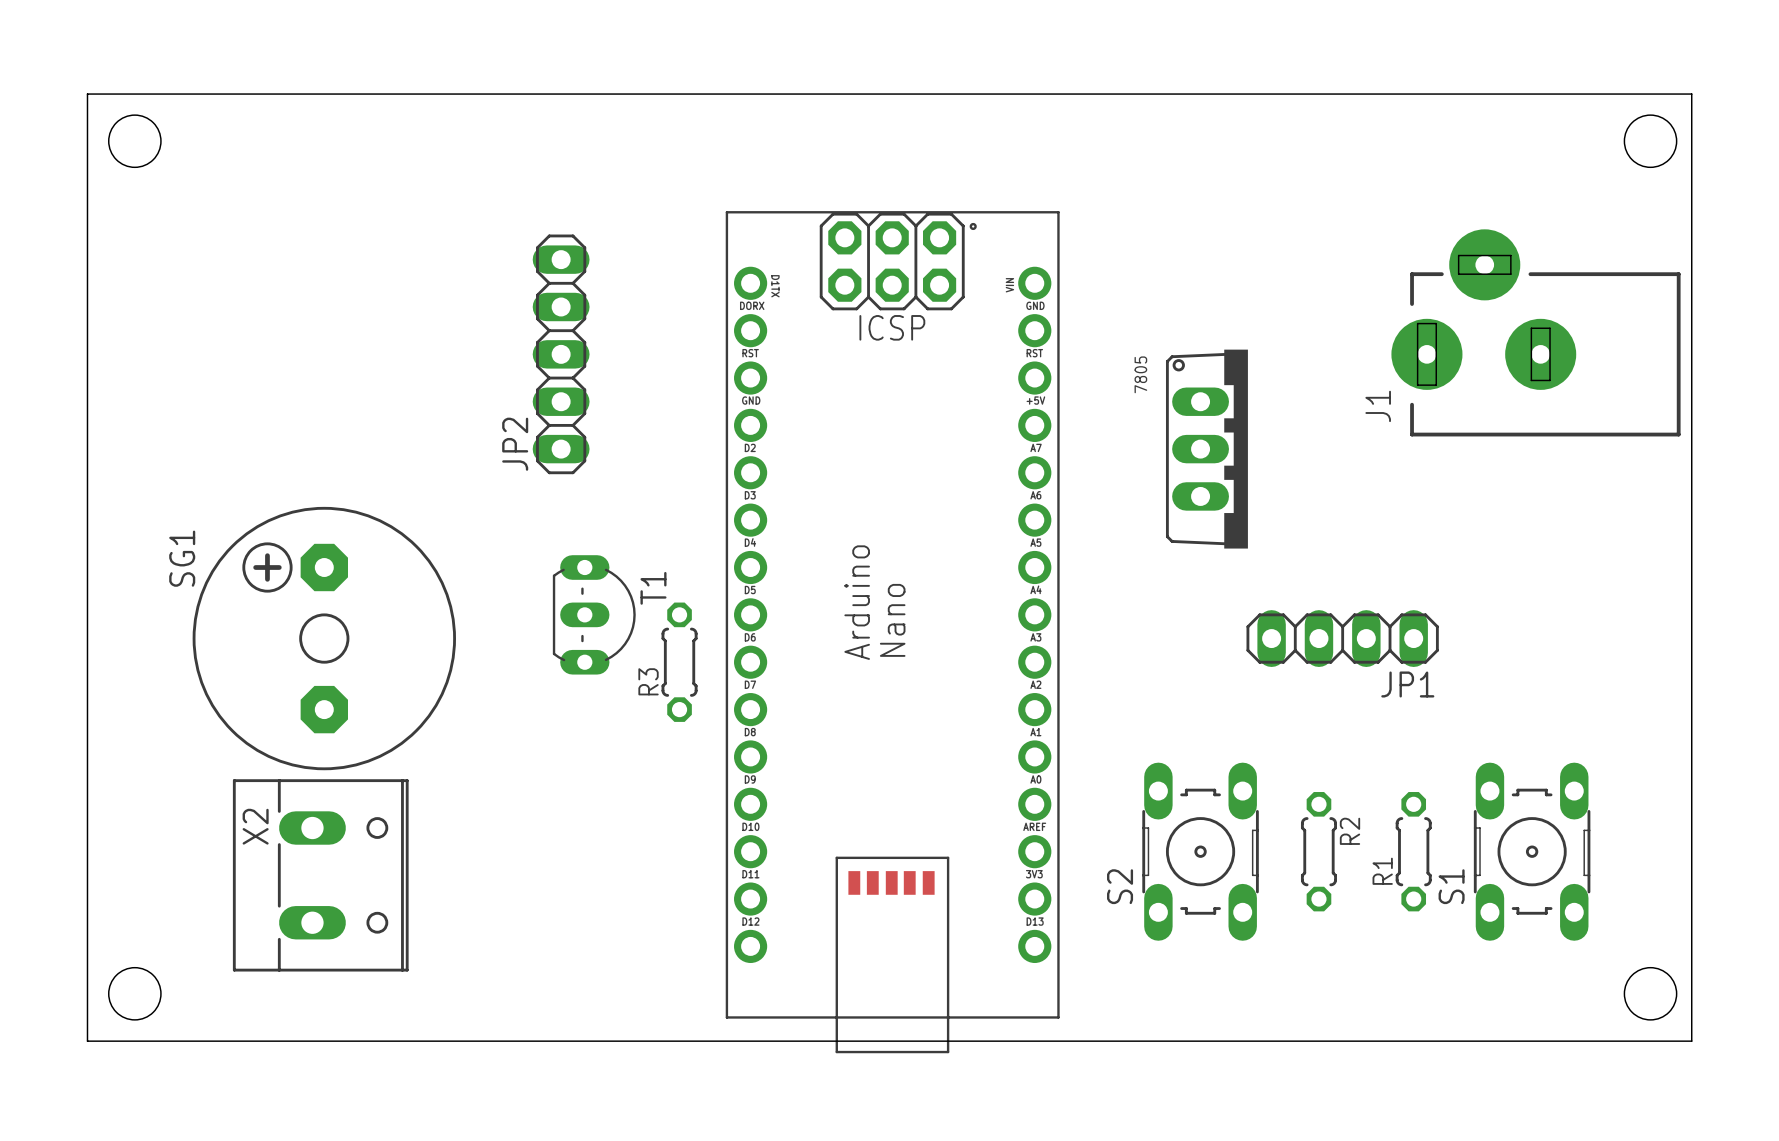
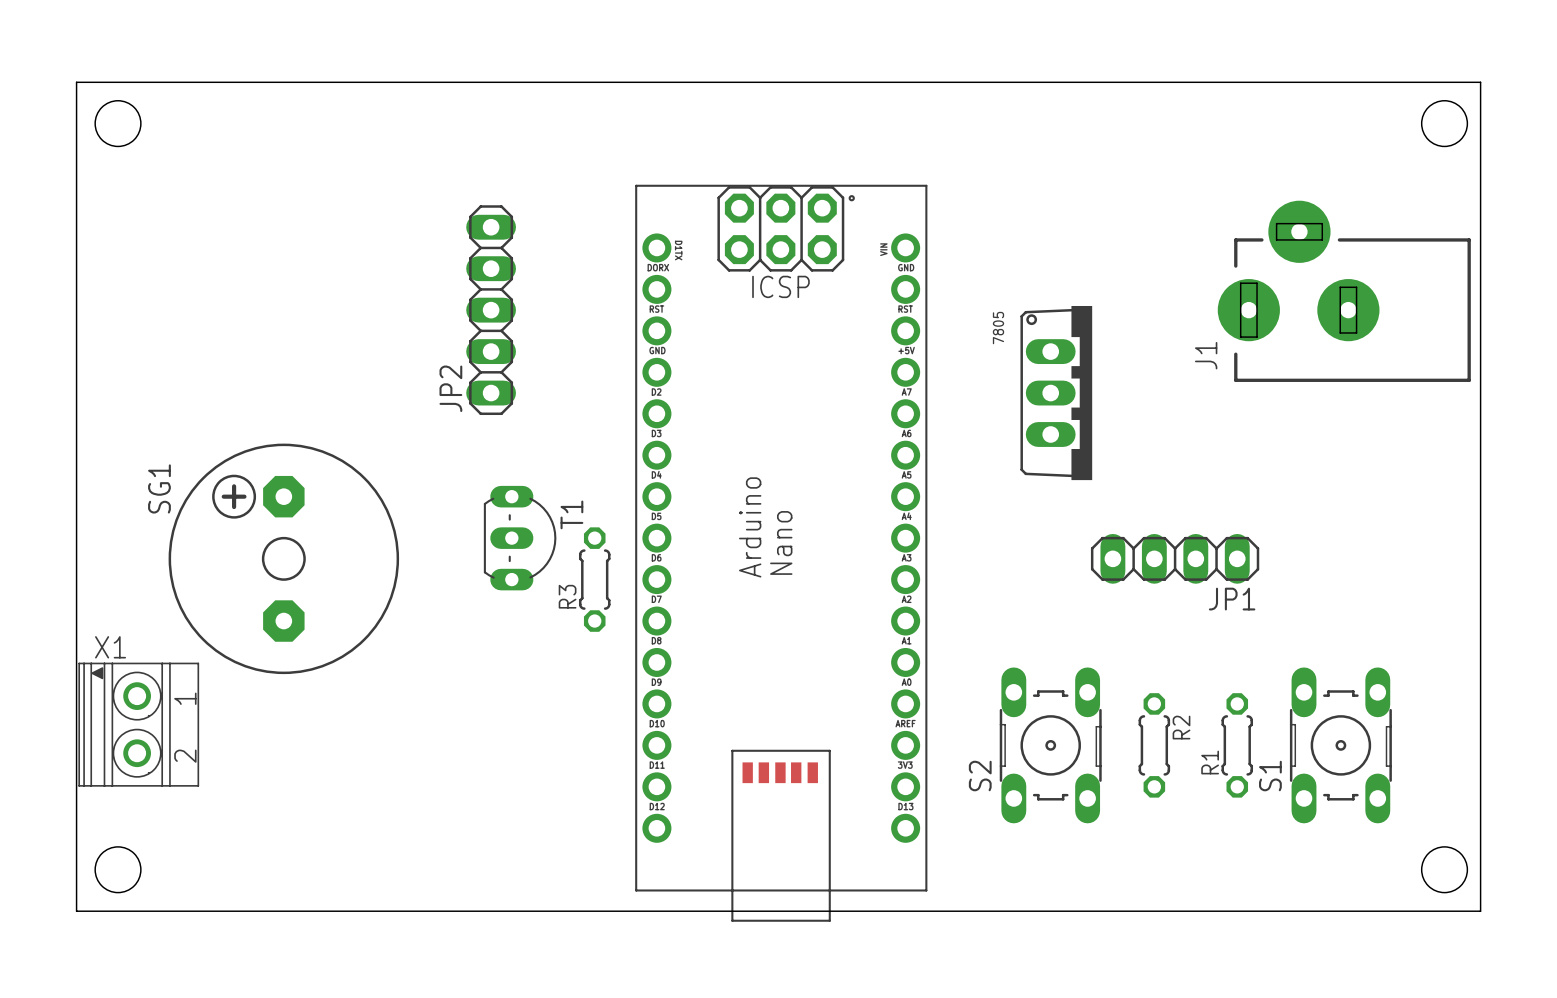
X1: none -> (138, 724)
X2: (320, 875) -> none

